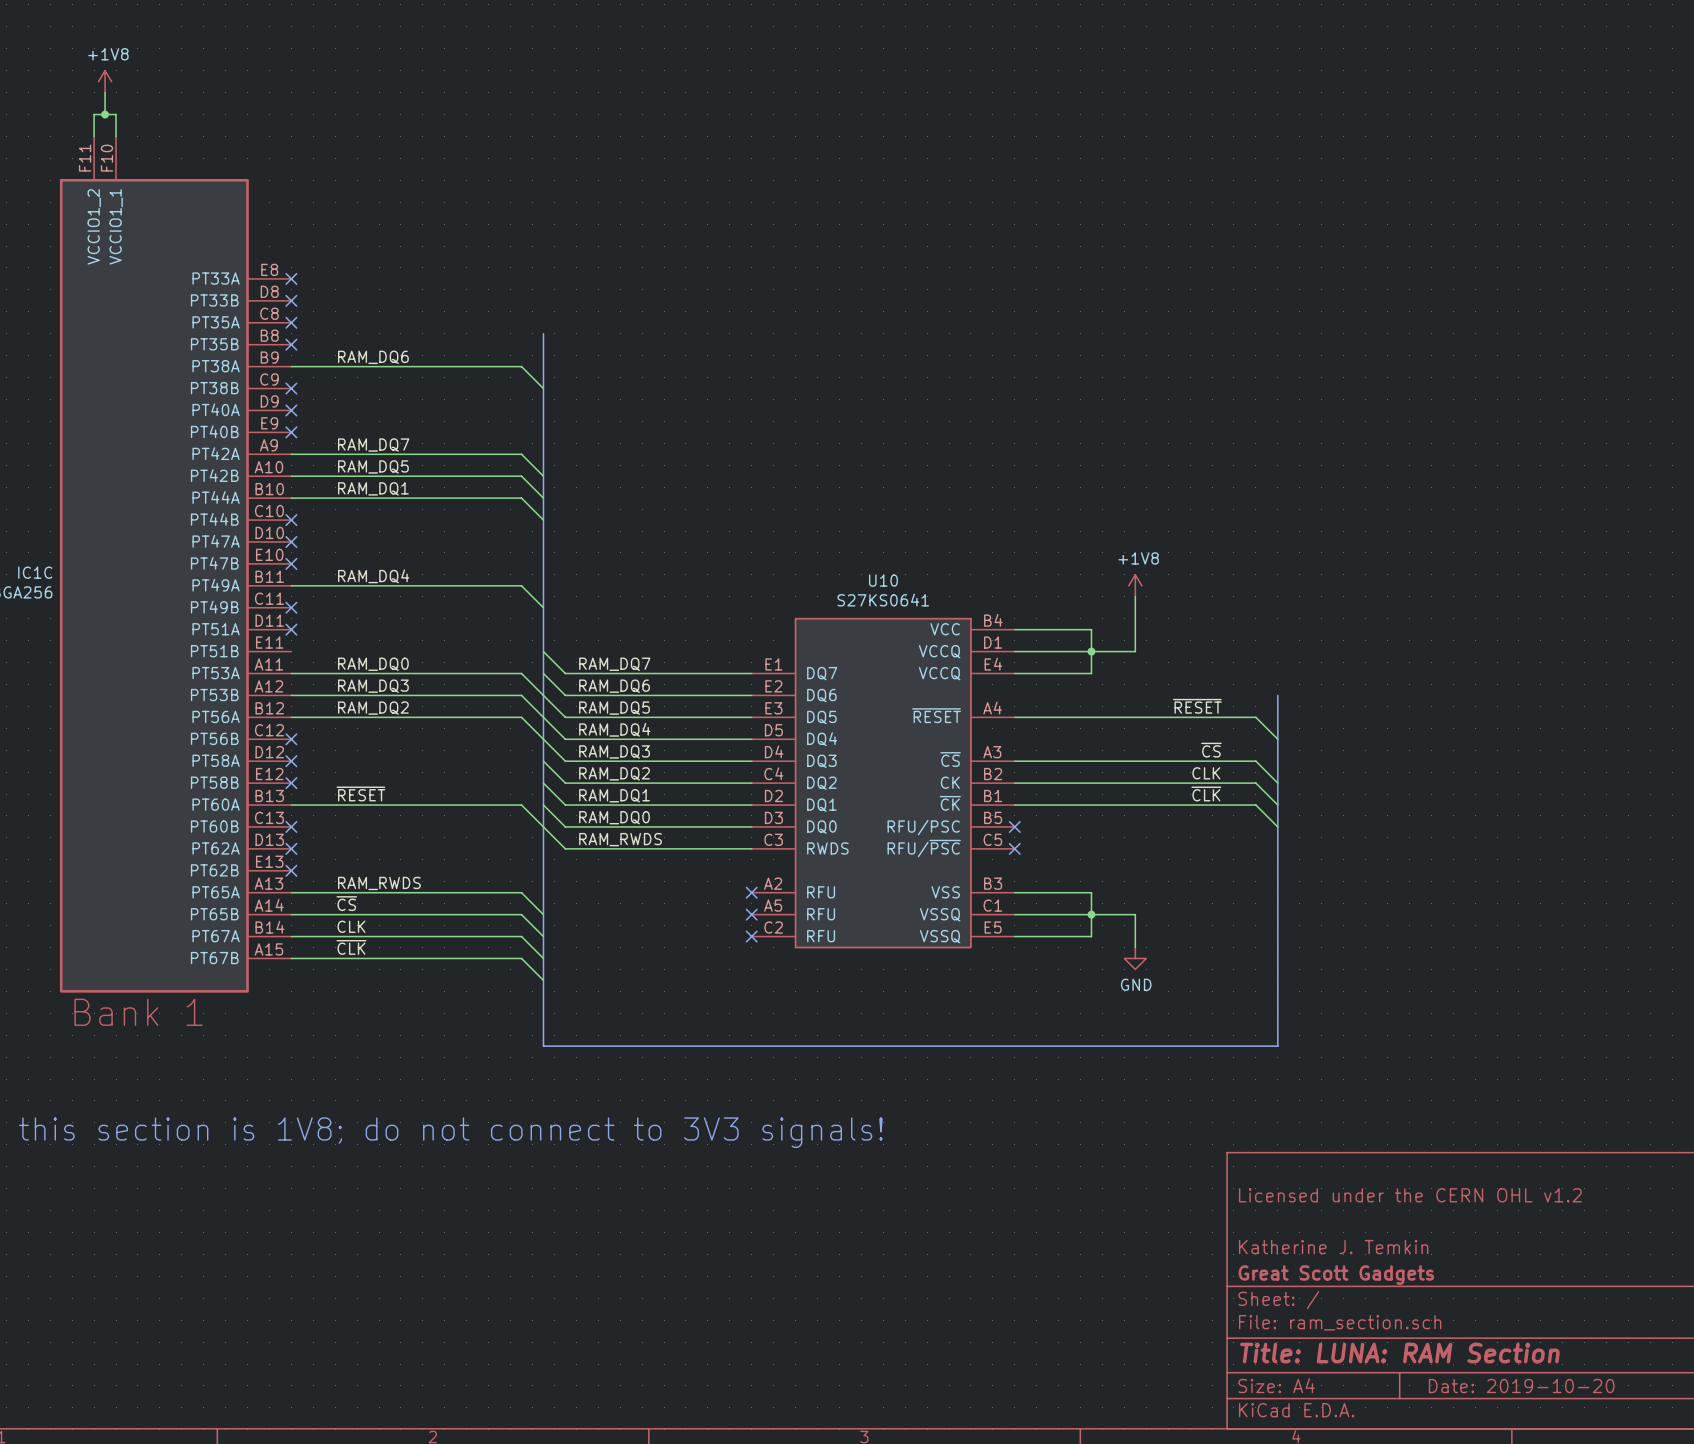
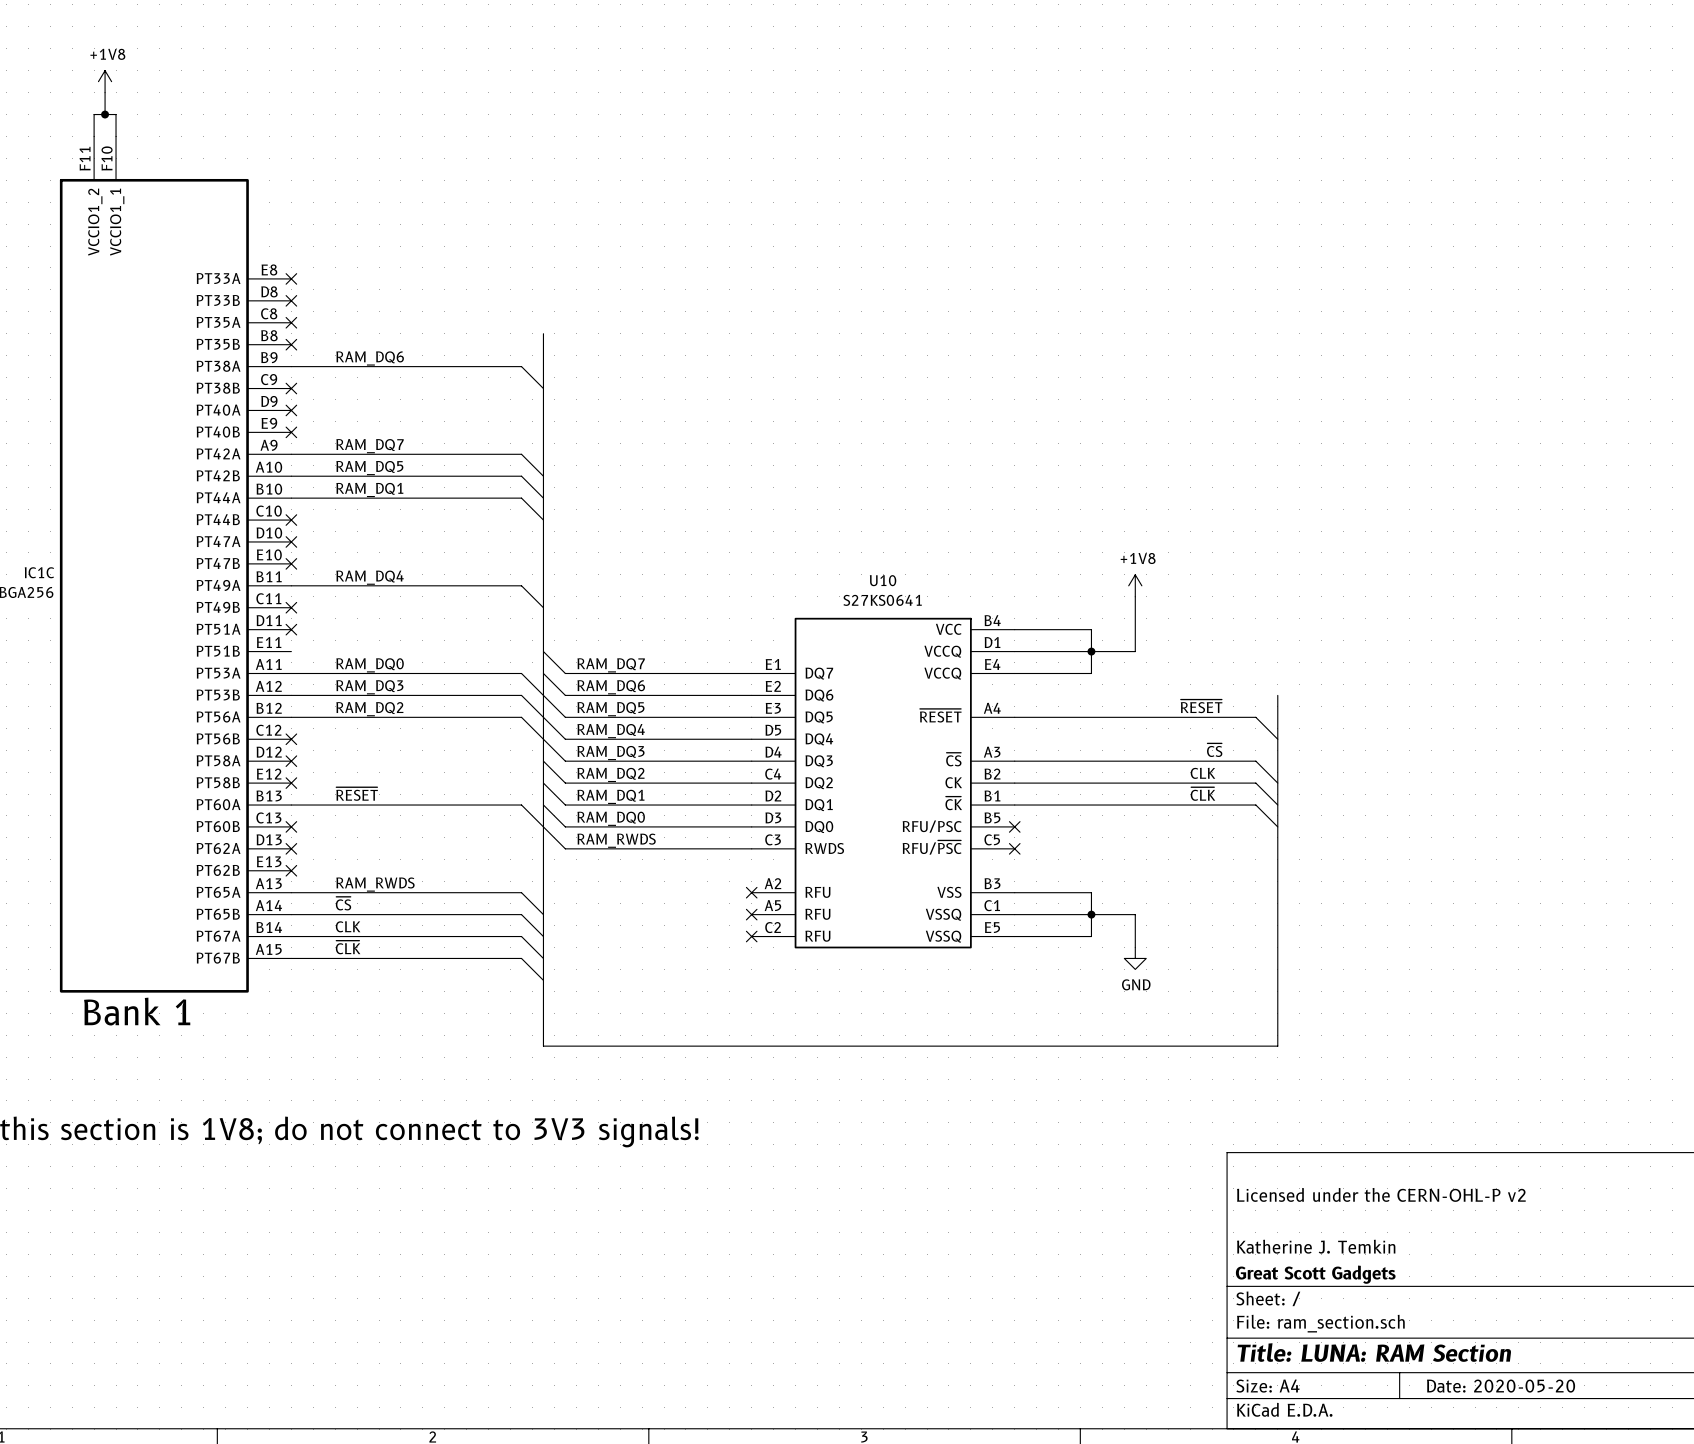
title block: Licensed under the CERN OHL v1.2 (1410, 1195) -> Licensed under the CERN-OHL-P v2 (1381, 1194)
title block: Date: 2019-10-20 (1521, 1386) -> Date: 2020-05-20 (1501, 1386)

